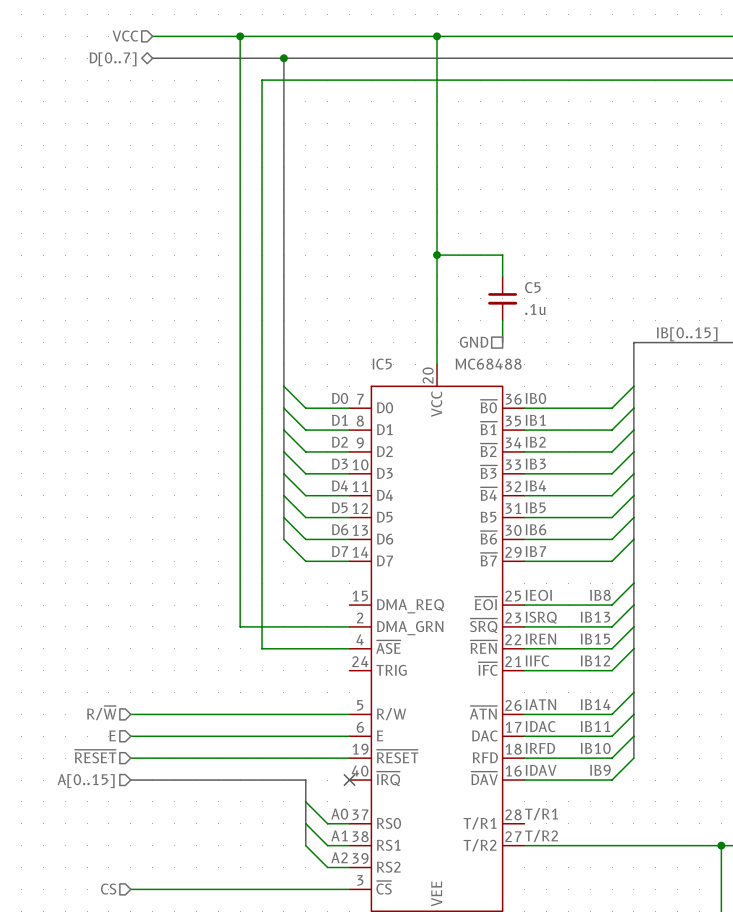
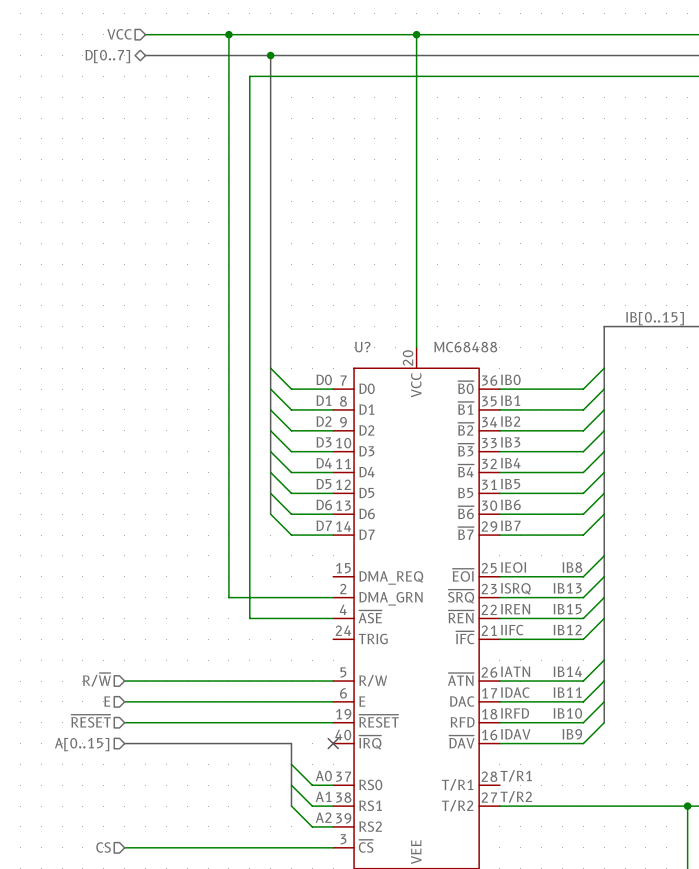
wire: (437, 255) (502, 255) (502, 276) -> none
junction: (437, 255) -> none
C5: .1u (502, 298) -> none
wire: (502, 320) (502, 342) -> none
hierarchical label: GND (474, 342) -> none
IC5 name: IC5 (382, 364) -> U? (362, 347)

